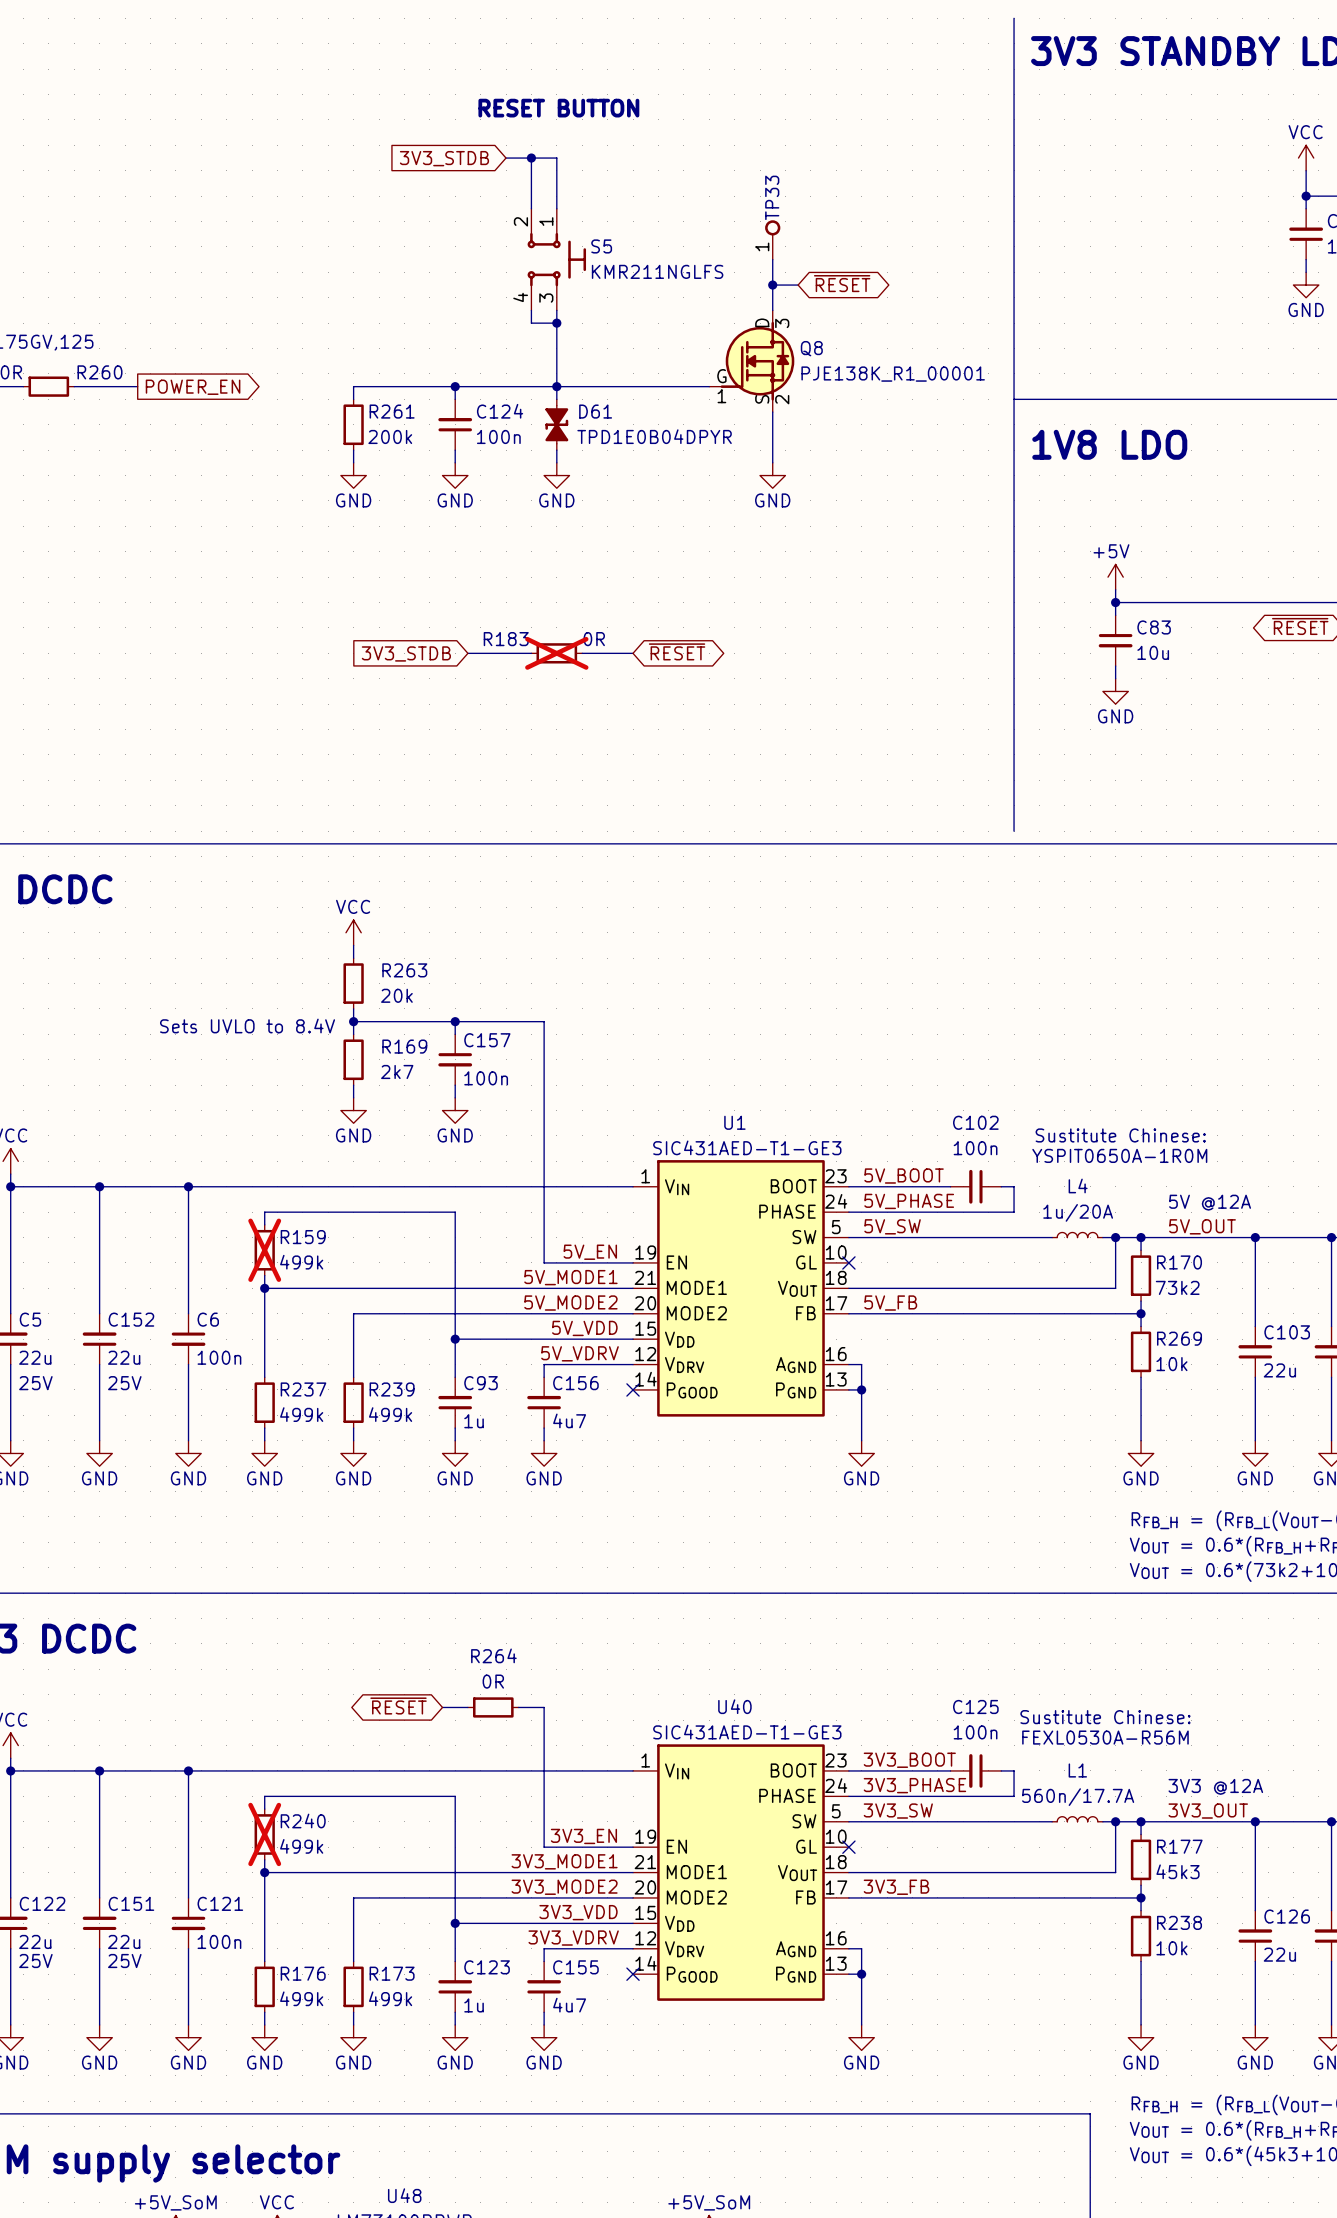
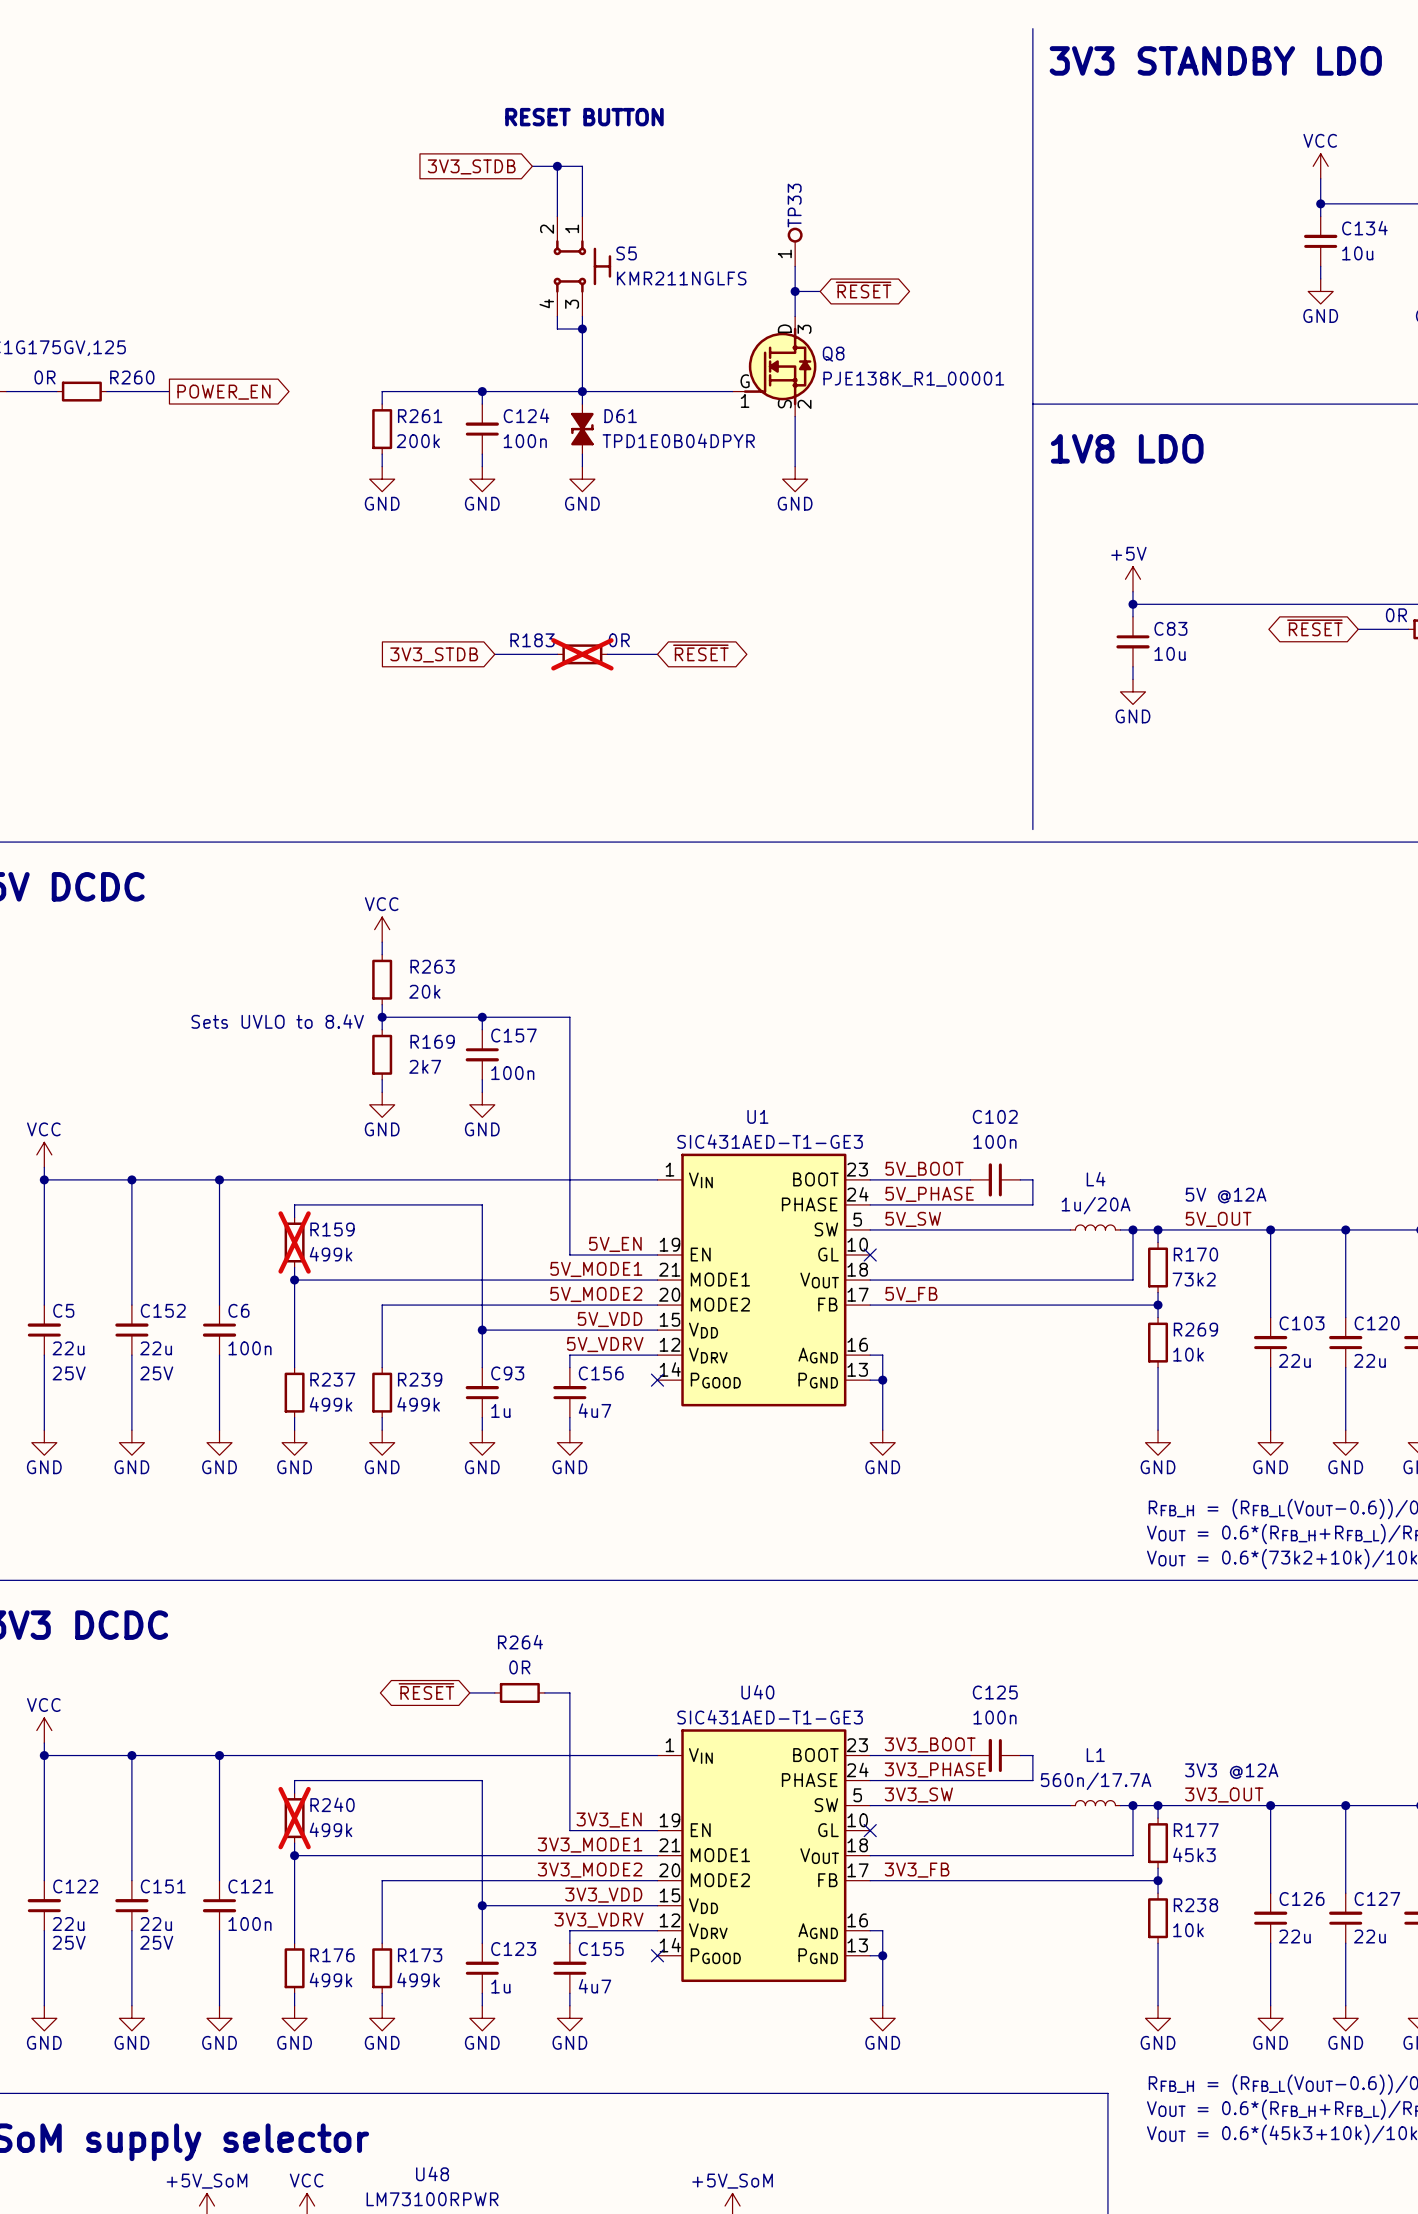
text: Sustitute Chinese: (1120, 1135) -> none
text: YSPIT0650A-1R0M (1119, 1155) -> none
text: Sustitute Chinese: (1105, 1717) -> none
text: FEXL0530A-R56M (1105, 1737) -> none

